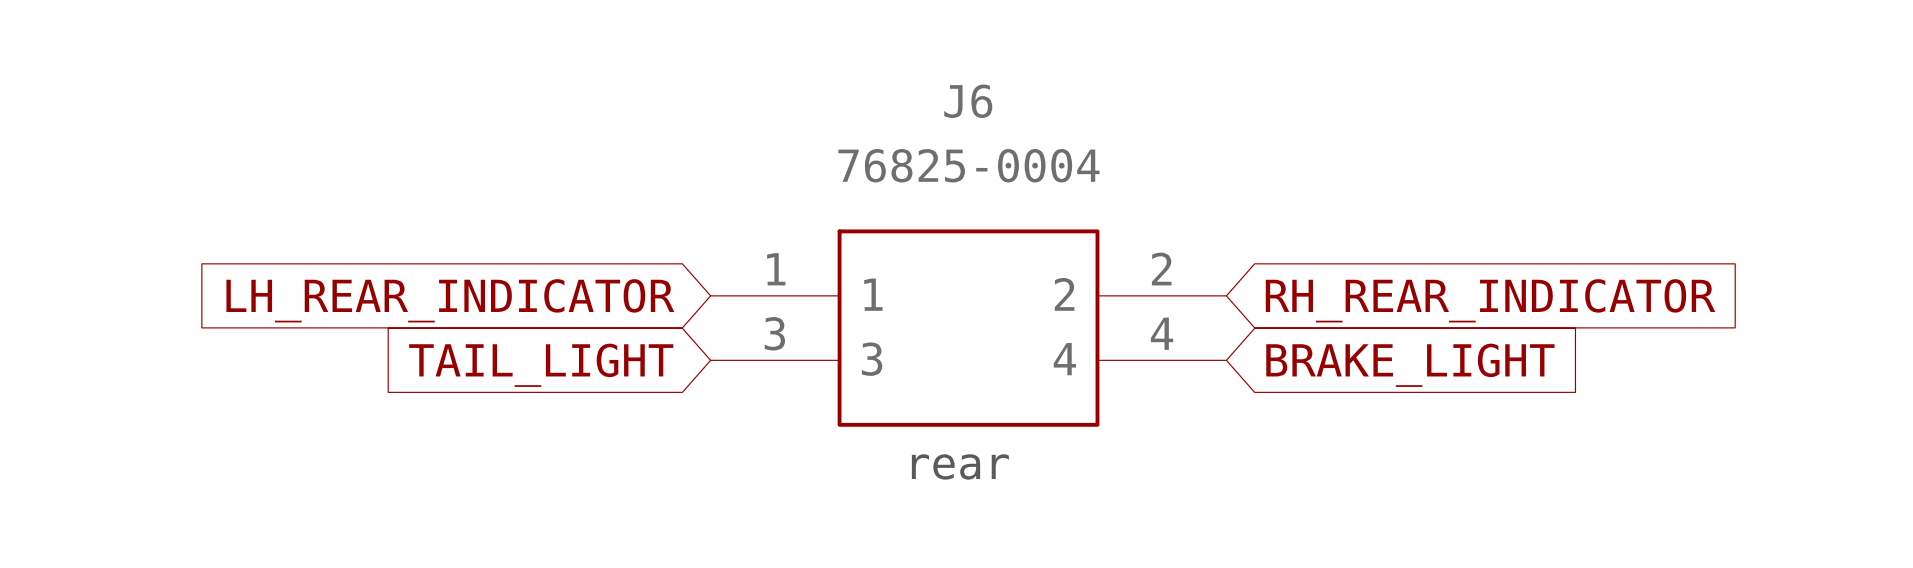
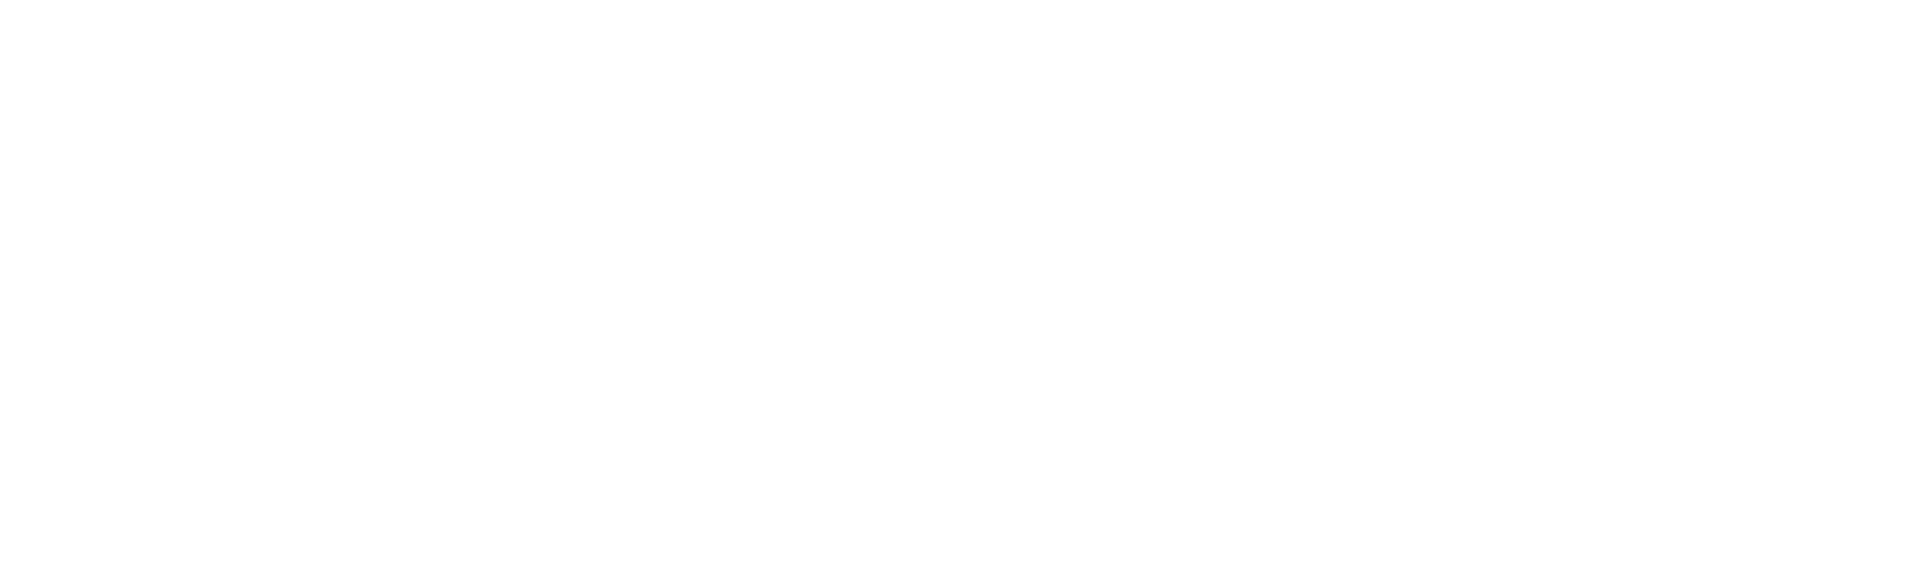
global label: LH_REAR_INDICATOR (450, 300) -> none
global label: RH_REAR_INDICATOR (1490, 300) -> none
J6: 76825-0004 (968, 328) -> none
global label: TAIL_LIGHT (541, 365) -> none
global label: BRAKE_LIGHT (1410, 365) -> none
text: rear (960, 466) -> none

